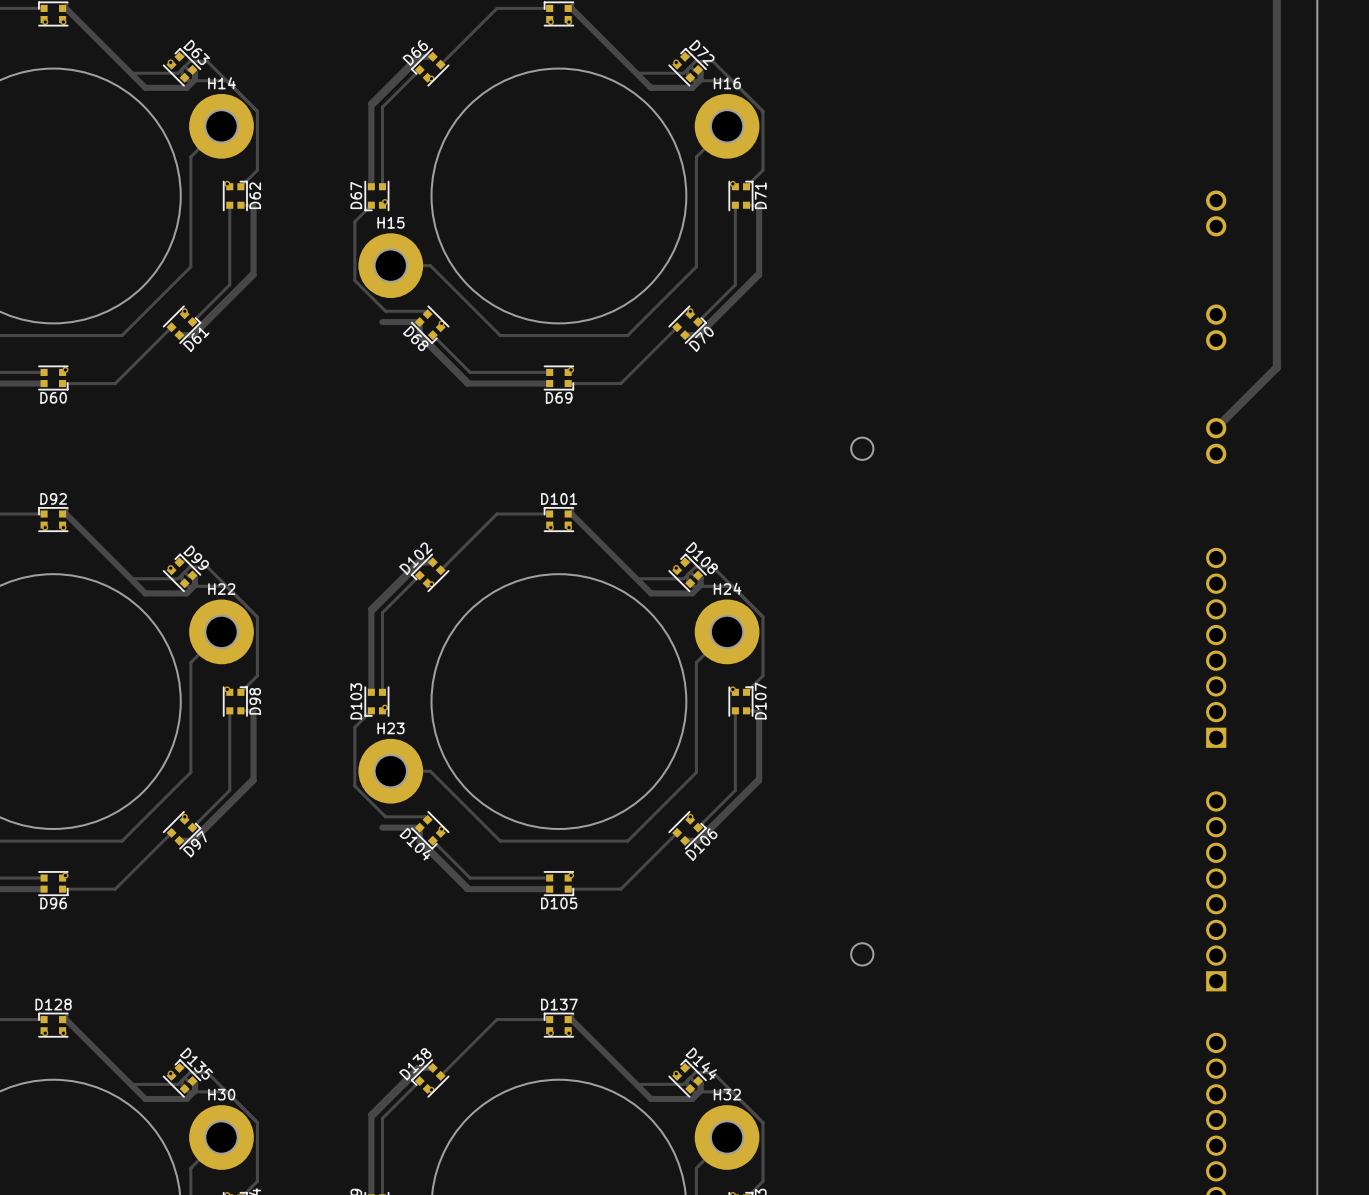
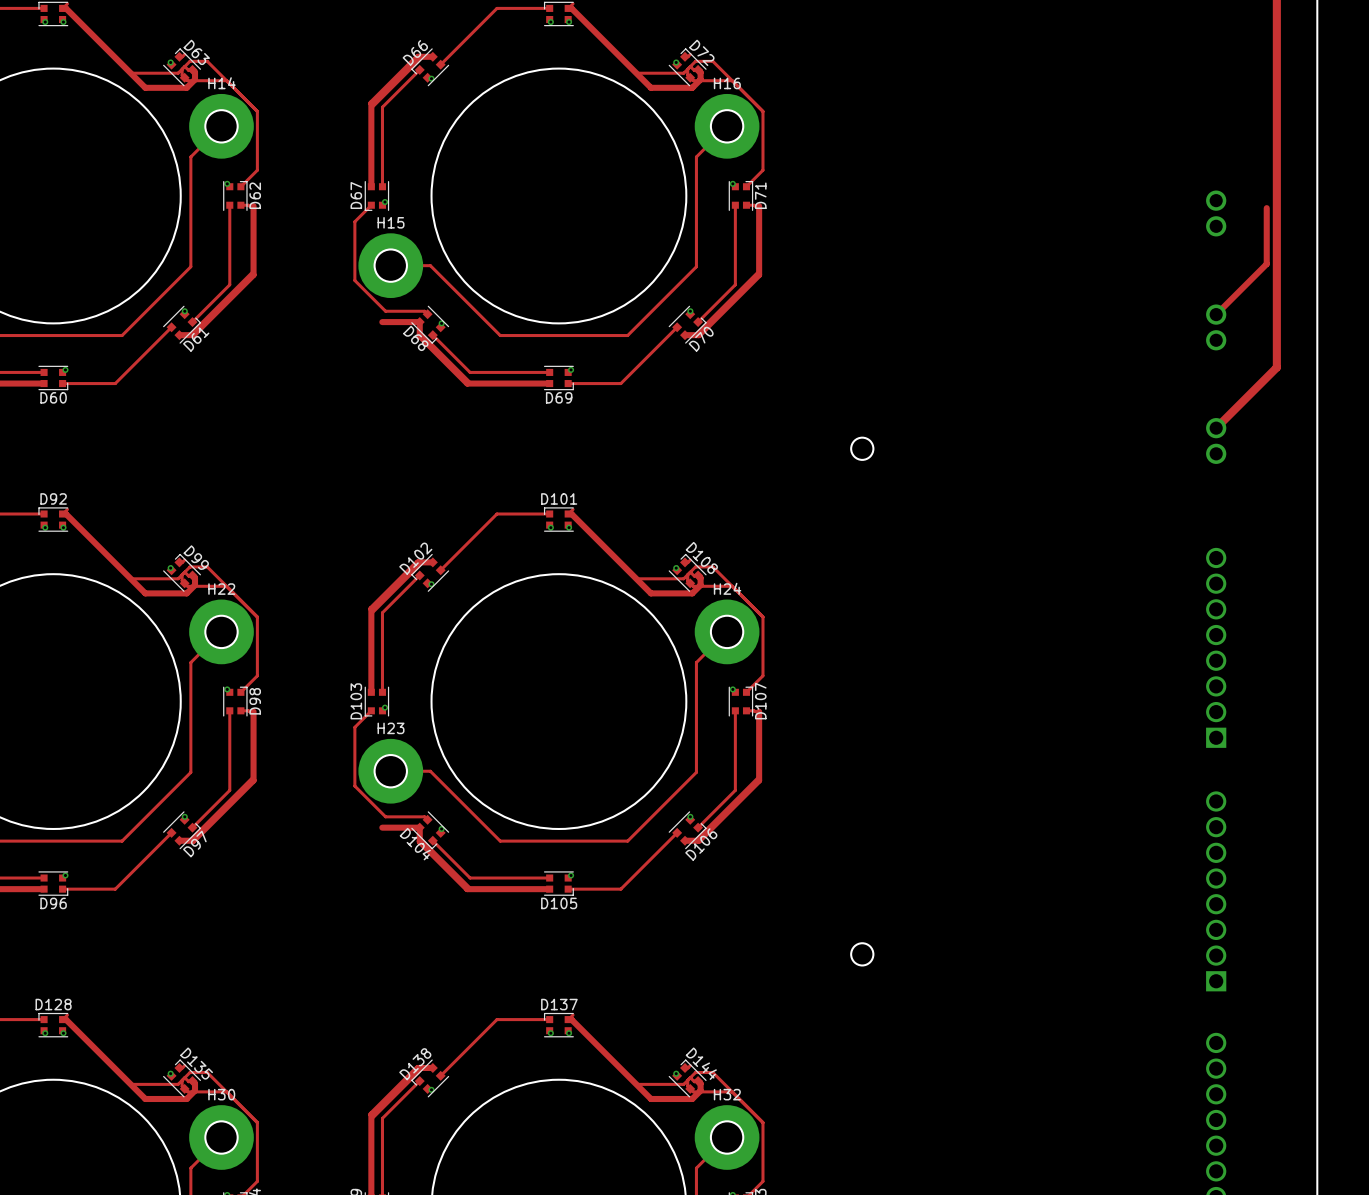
track: none -> (1266, 208) (1266, 264) (1216, 314)

